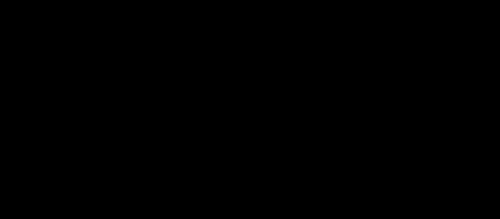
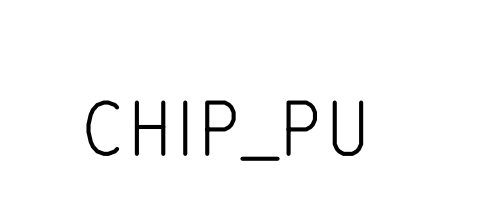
label: none -> CHIP_PU (224, 130)

